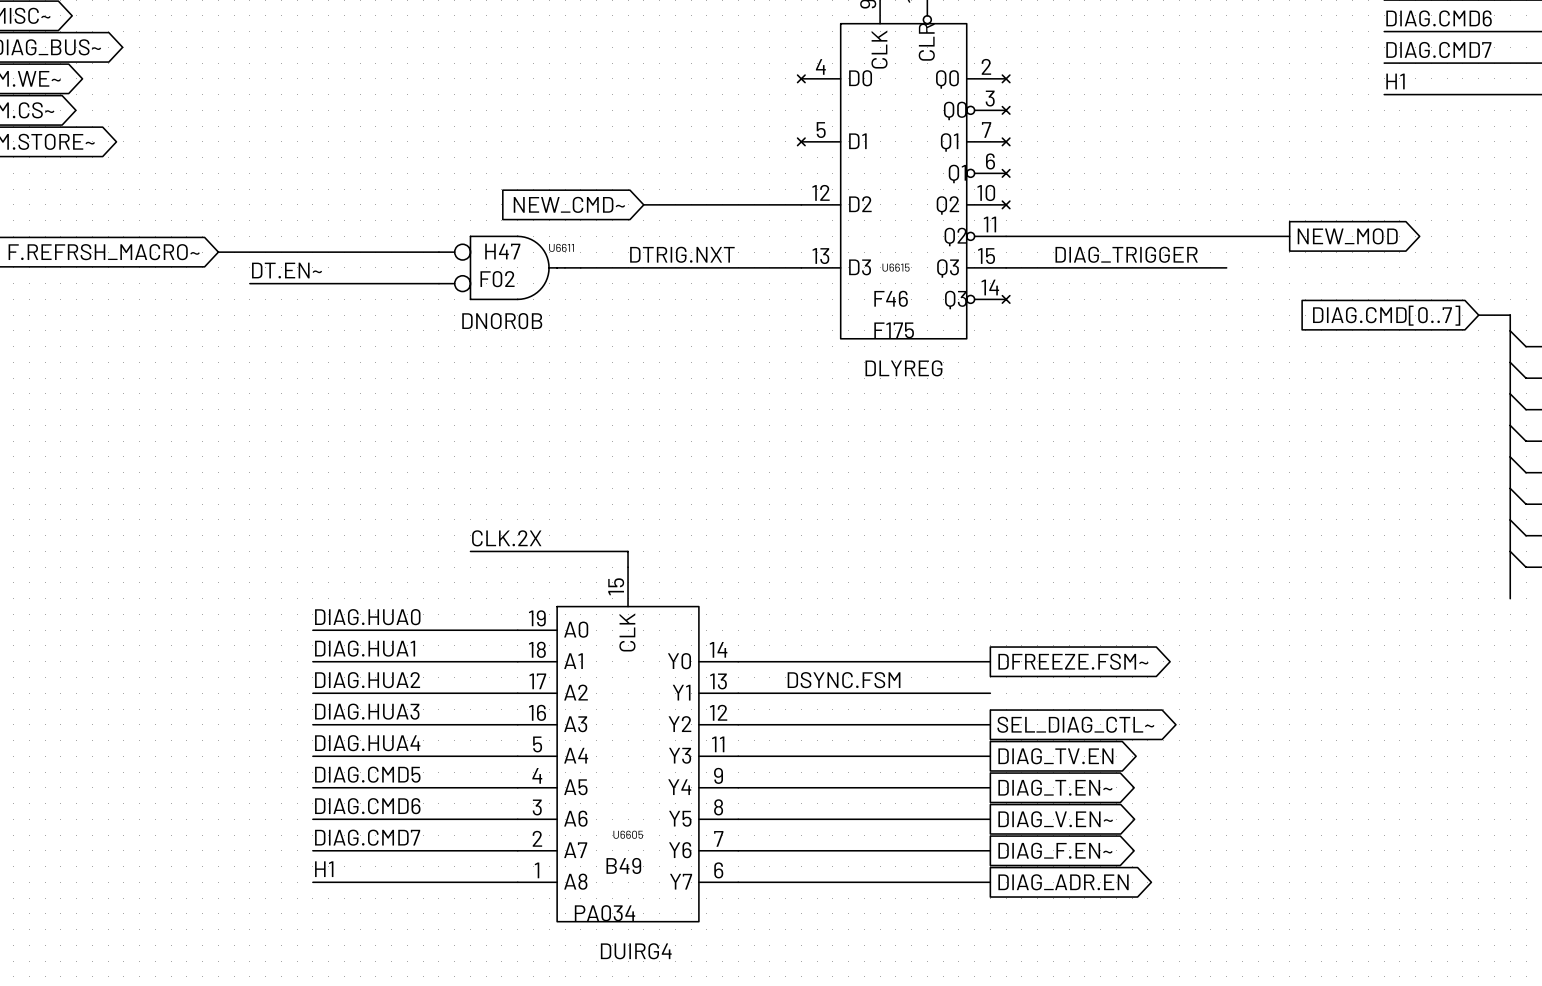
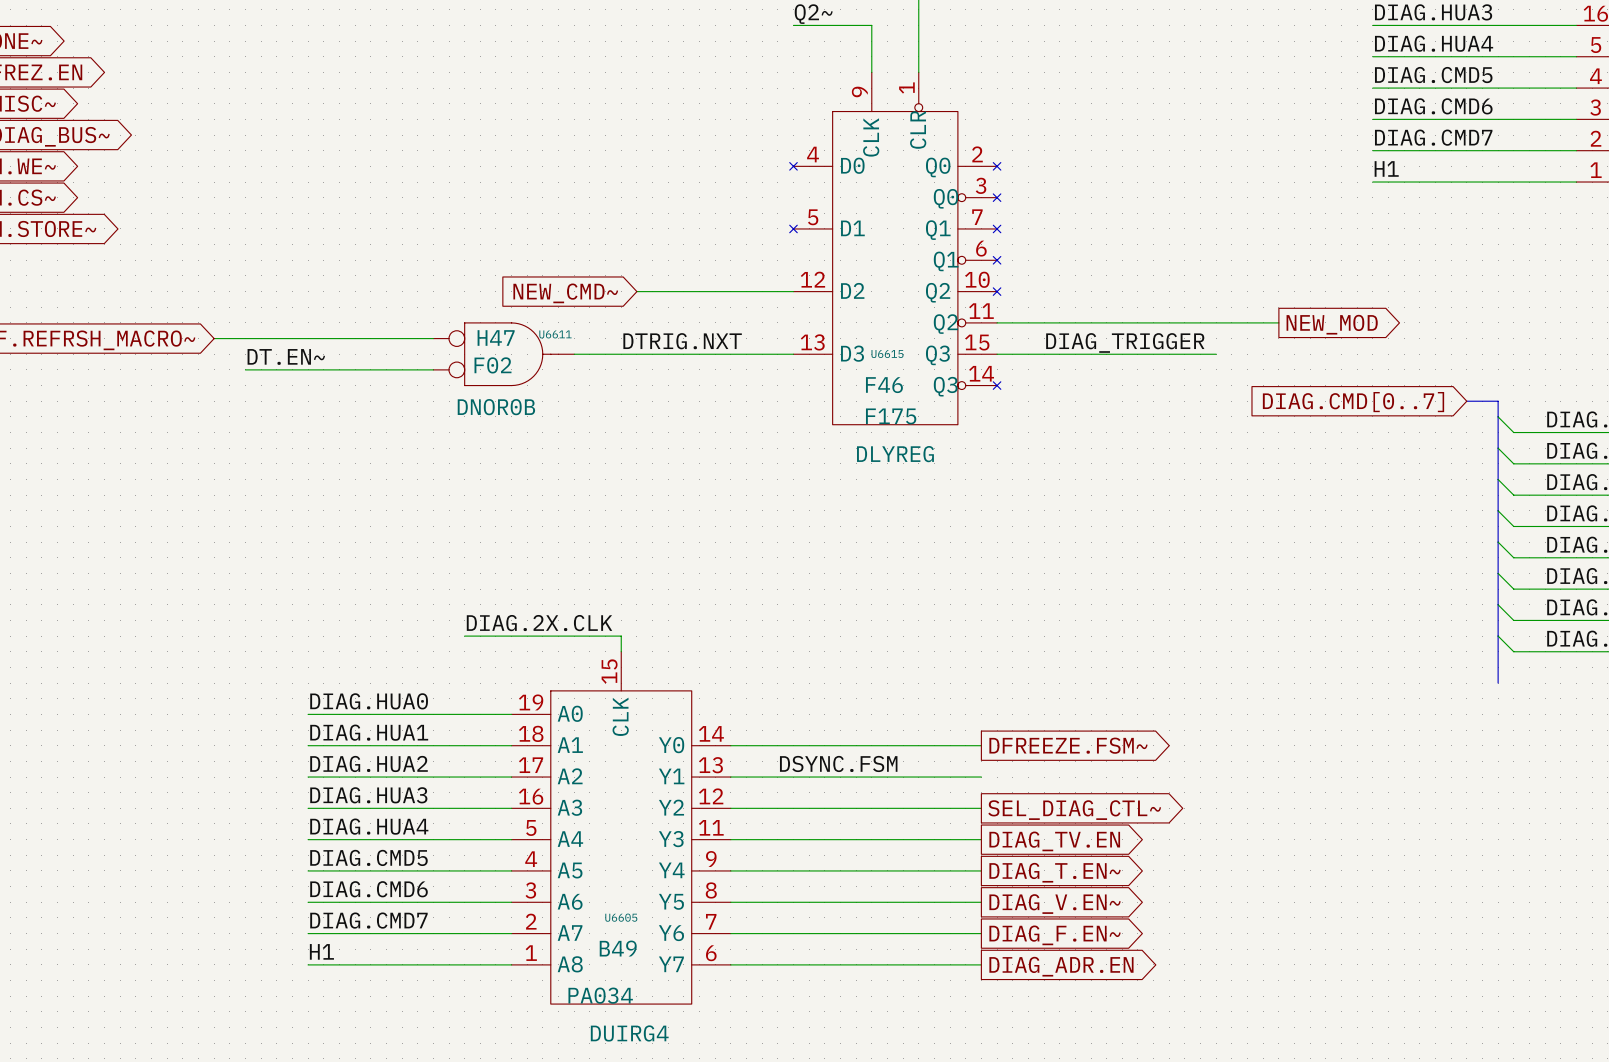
label: CLK.2X (506, 538) -> DIAG.2X.CLK (539, 623)

